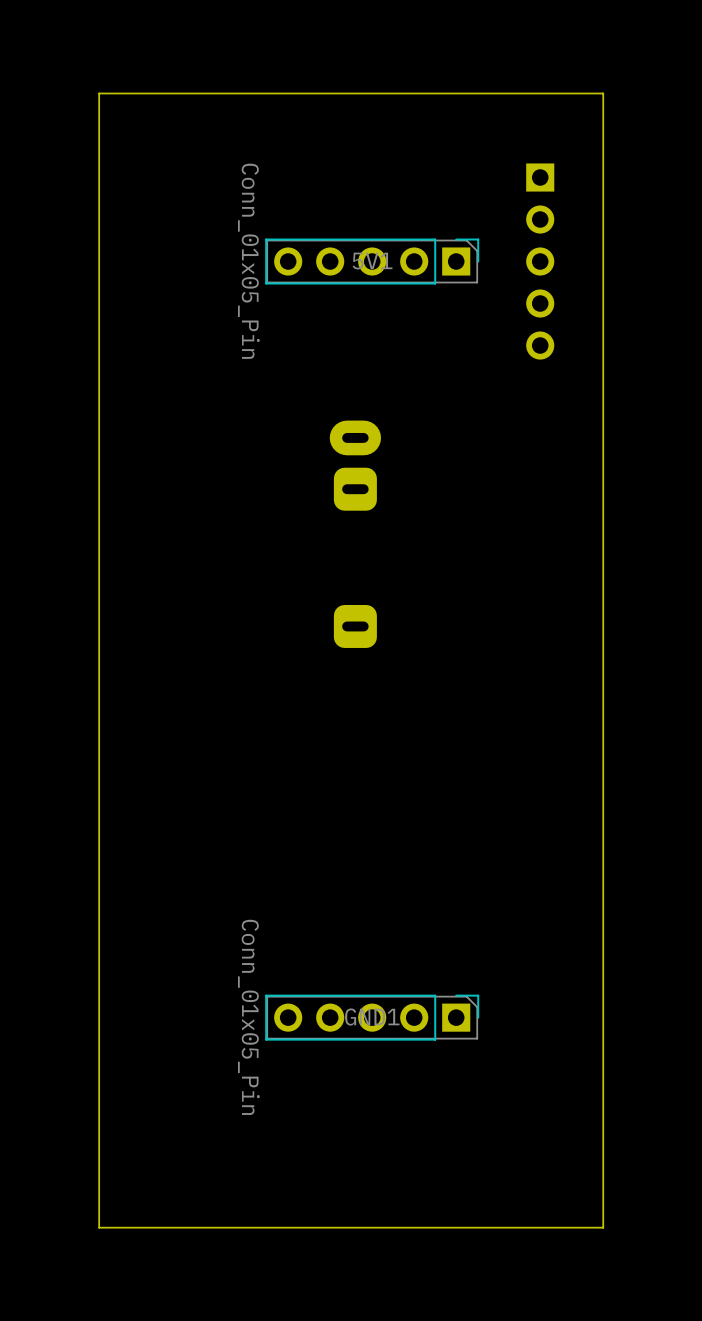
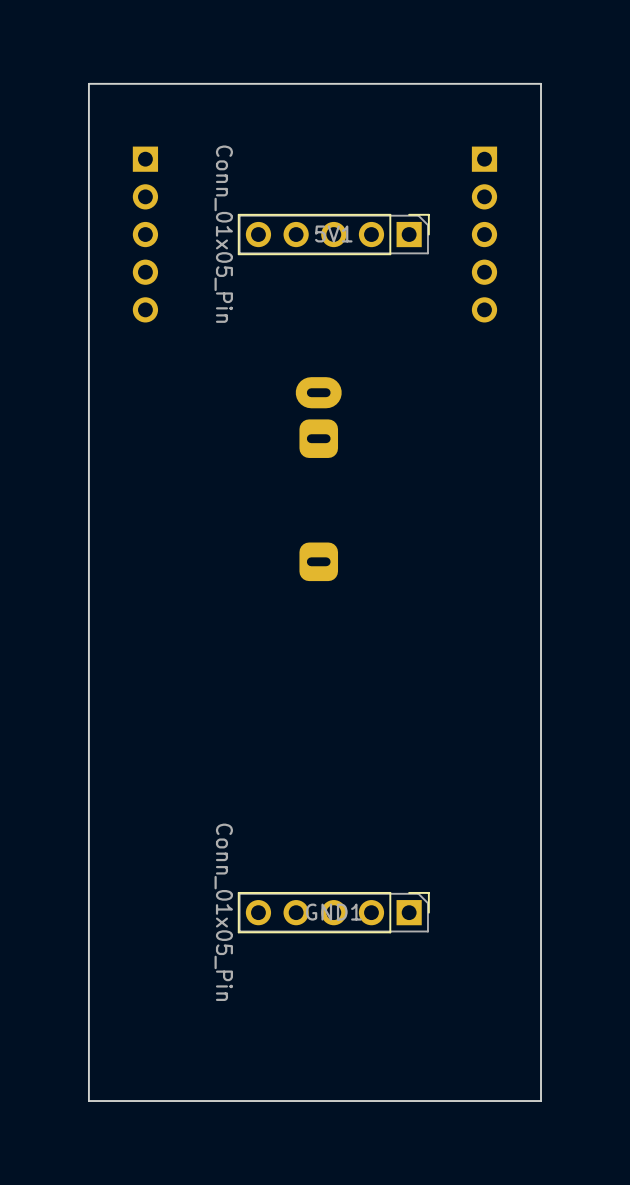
part: none -> (145, 234)

